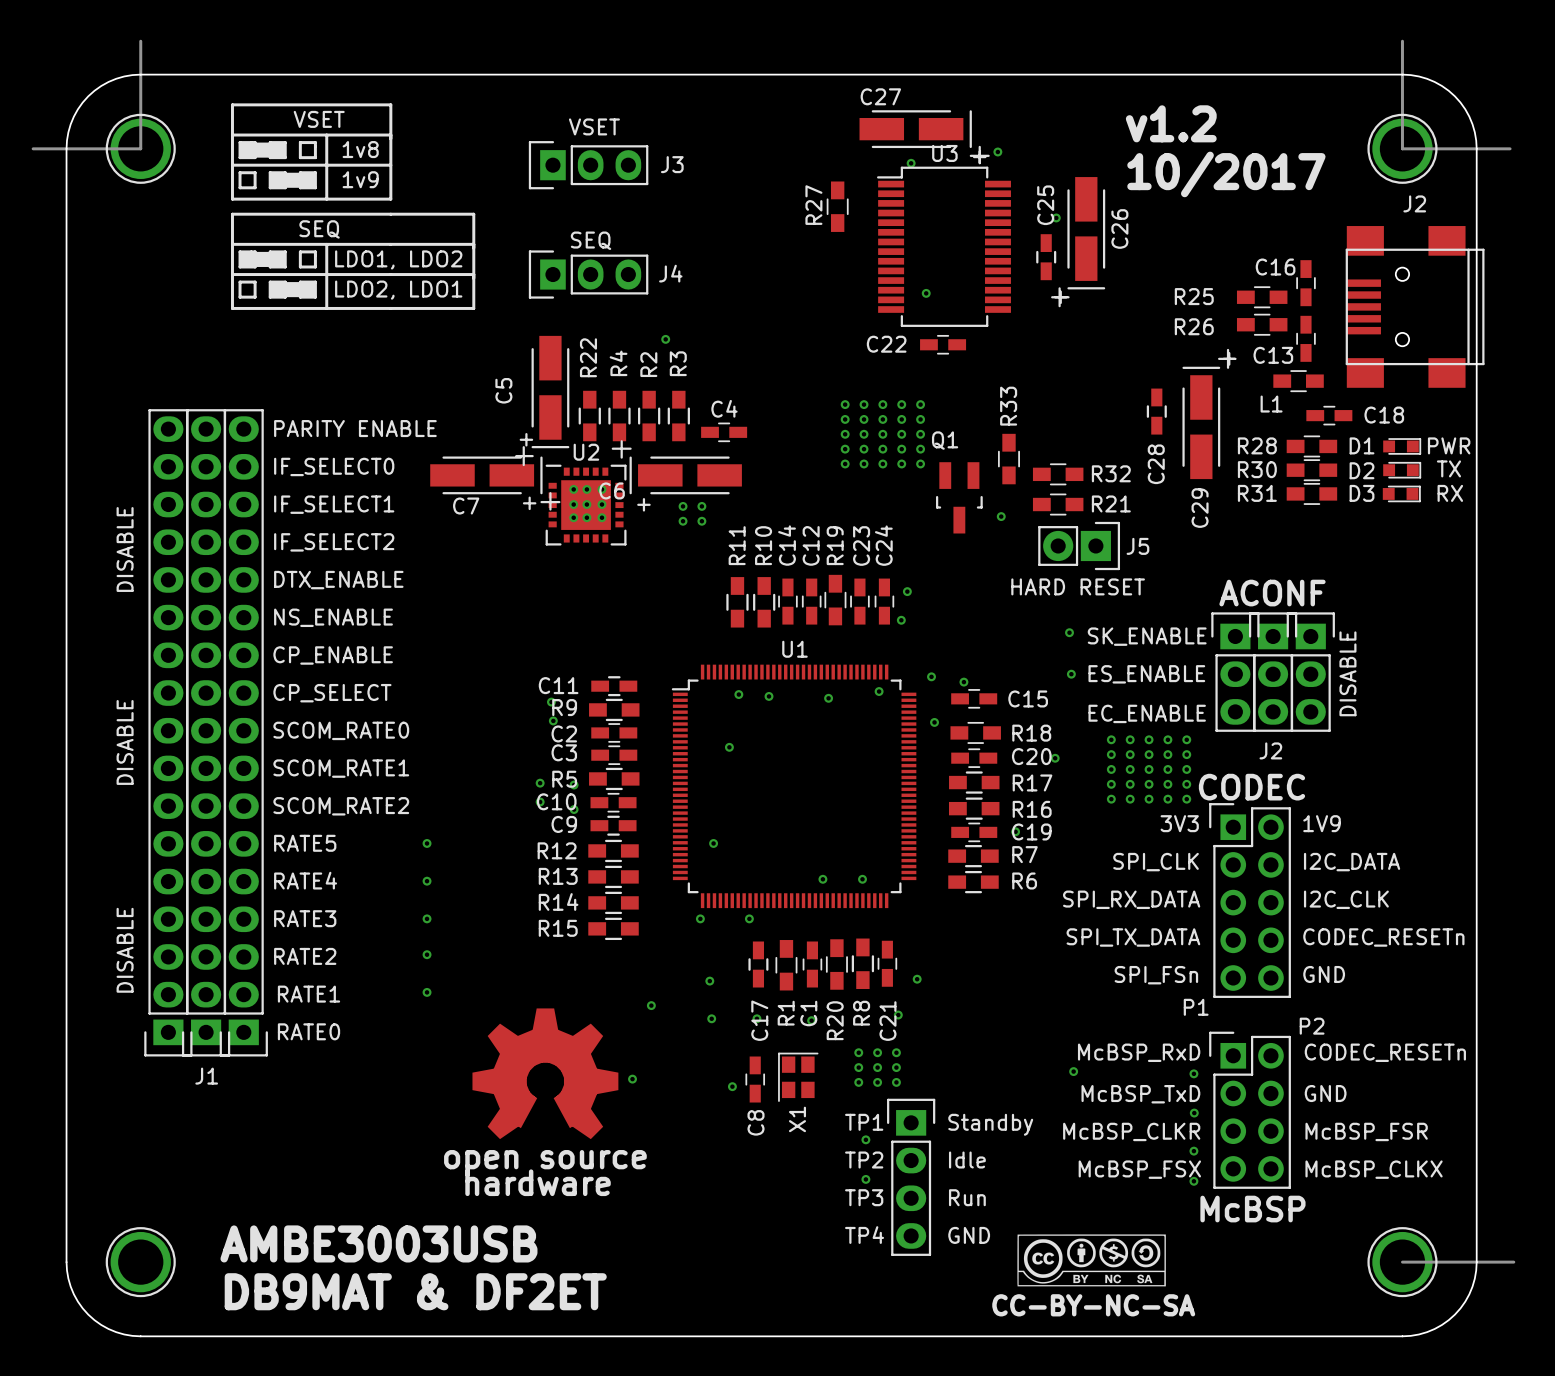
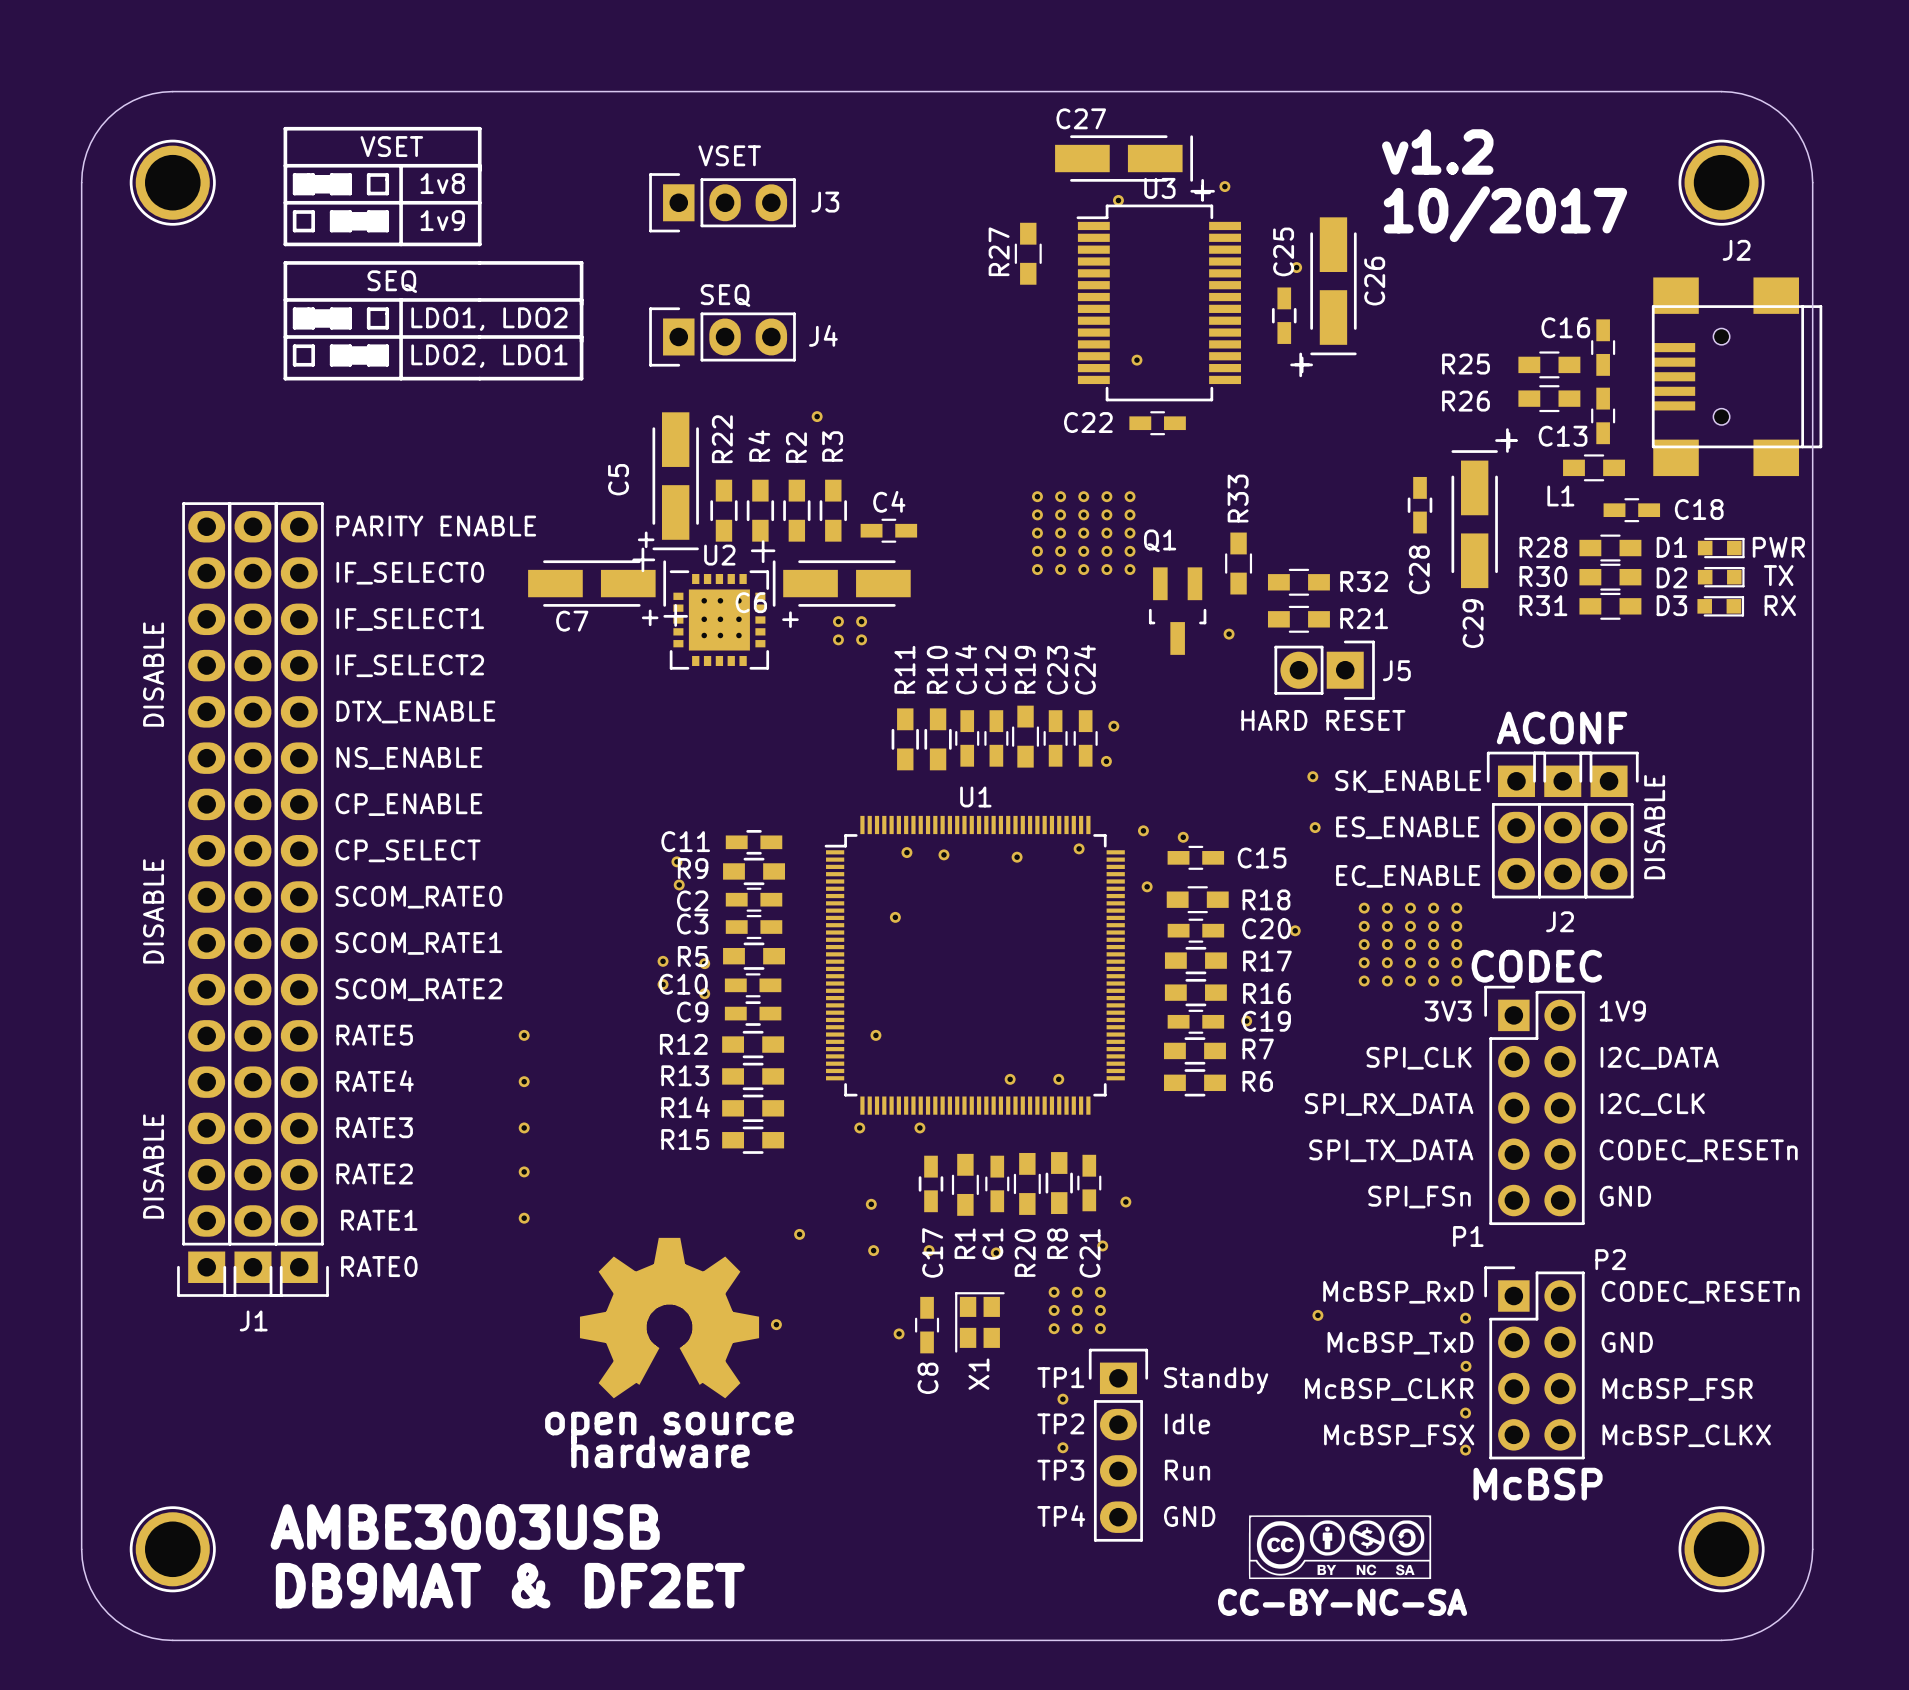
line: (140, 41) (140, 148) (33, 148) -> none
line: (1402, 41) (1402, 148) (1510, 148) -> none
line: (1402, 1262) (1513, 1262) -> none

